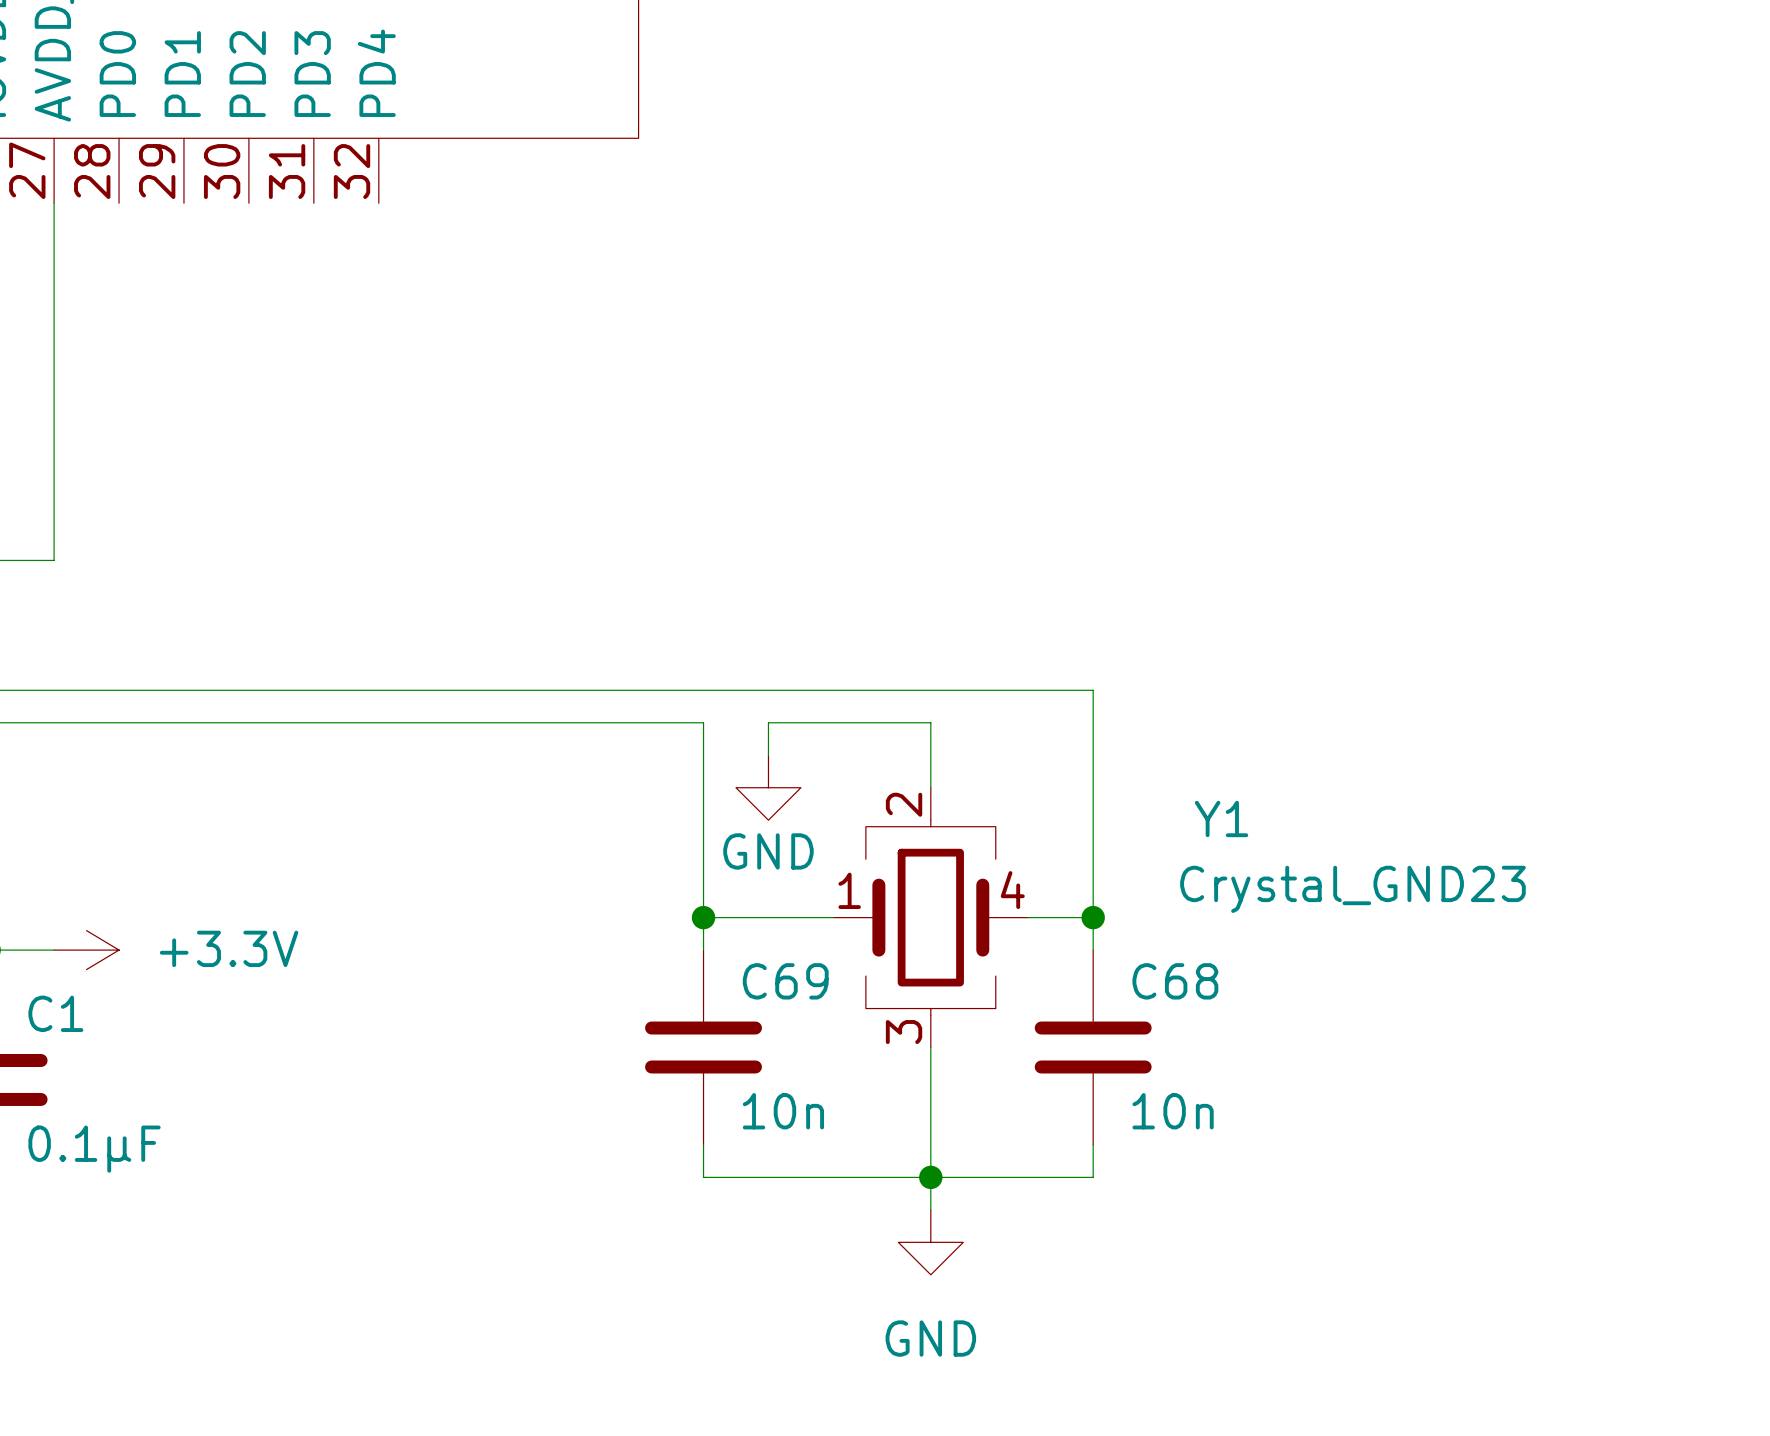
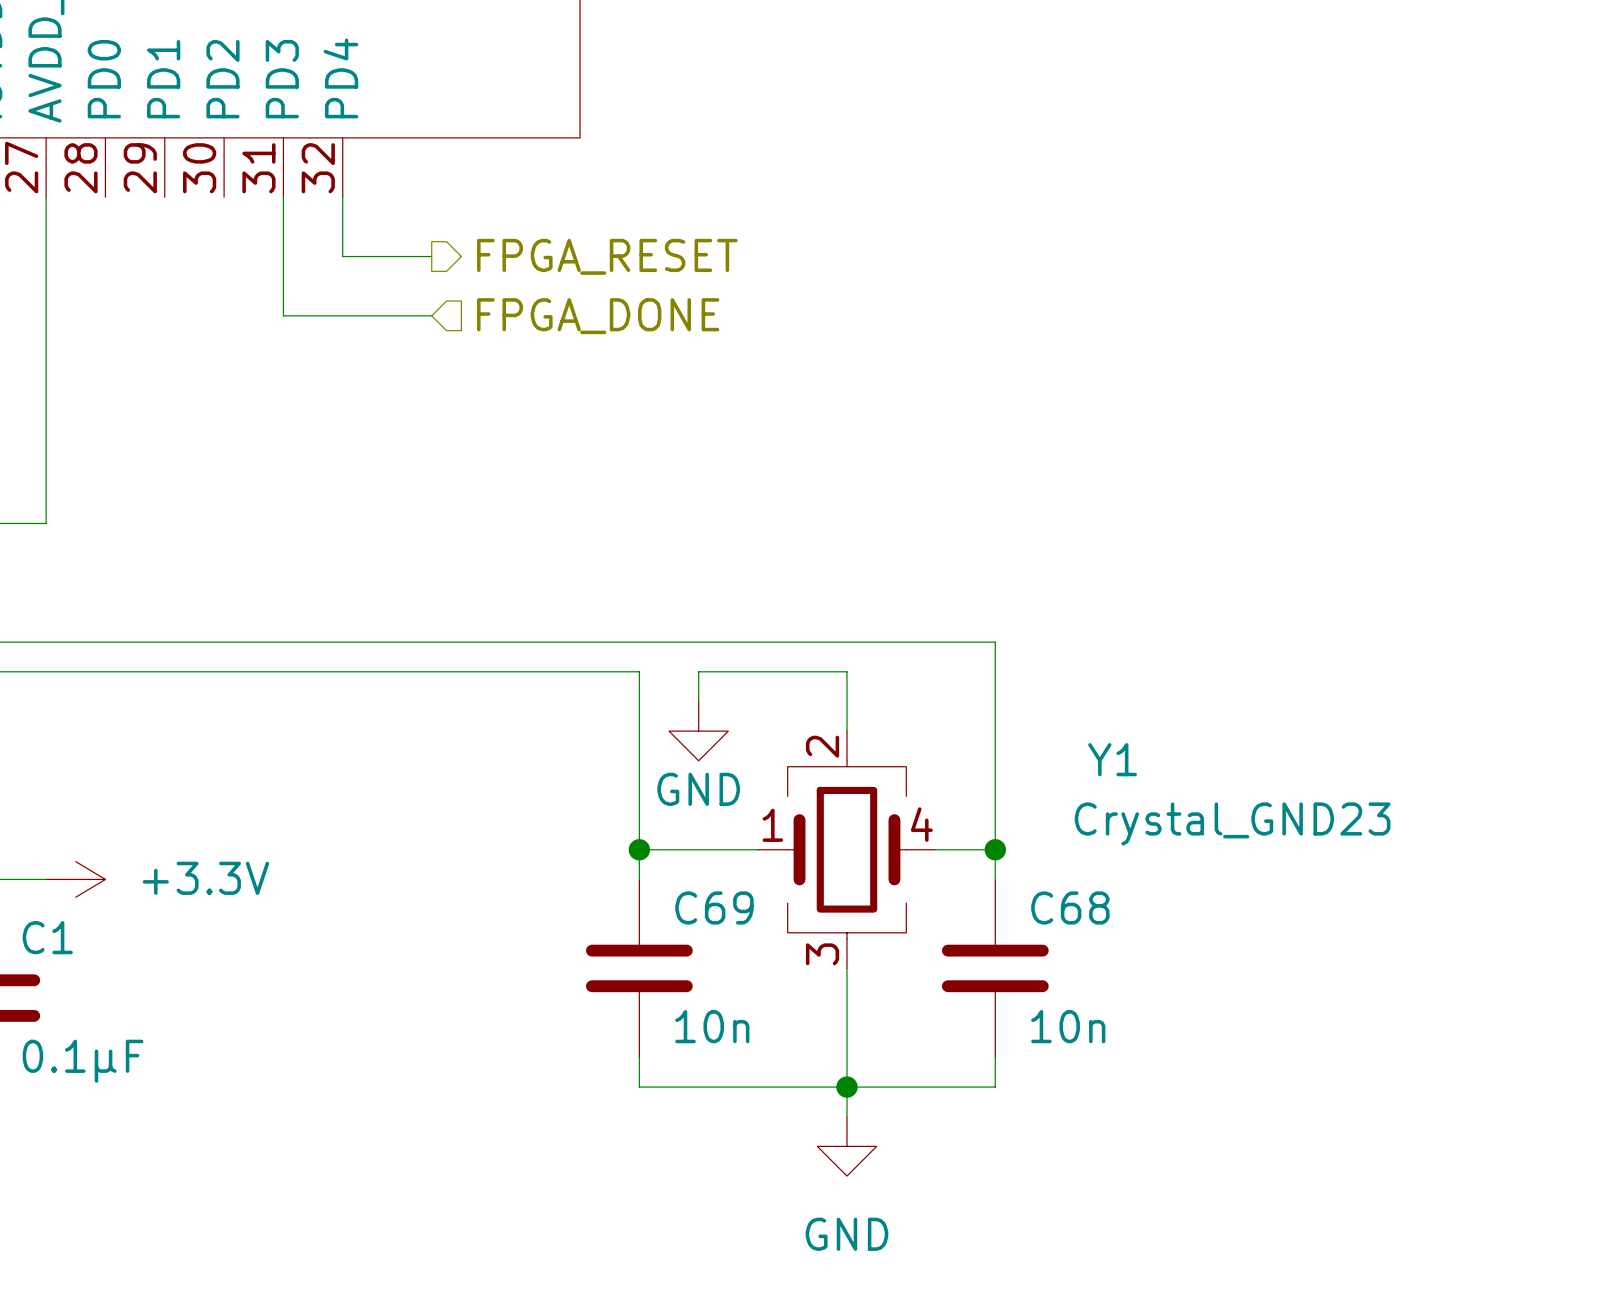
wire: none -> (283, 197) (283, 315) (431, 315)
wire: none -> (342, 197) (342, 256) (431, 256)
hierarchical label: none -> FPGA_RESET (607, 256)
hierarchical label: none -> FPGA_DONE (598, 316)

